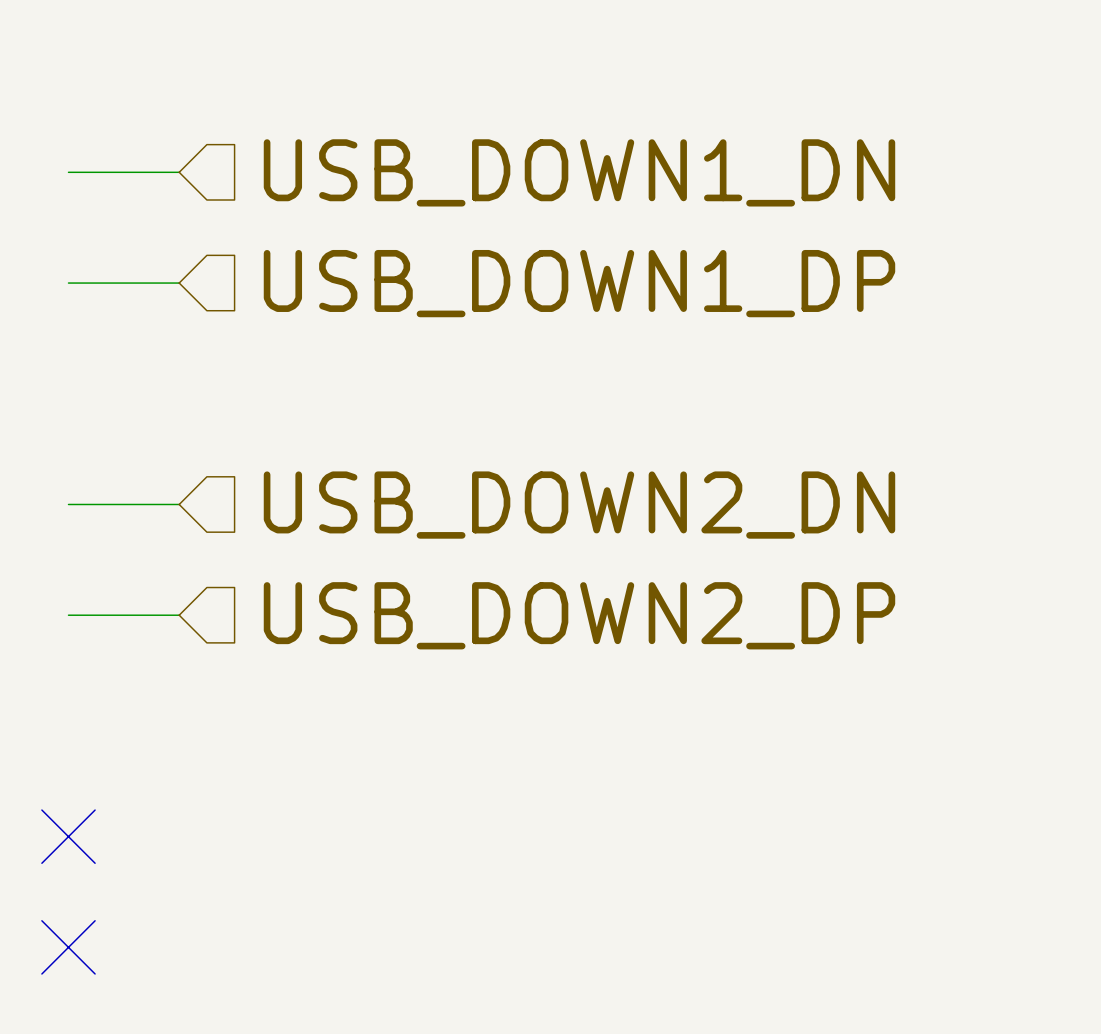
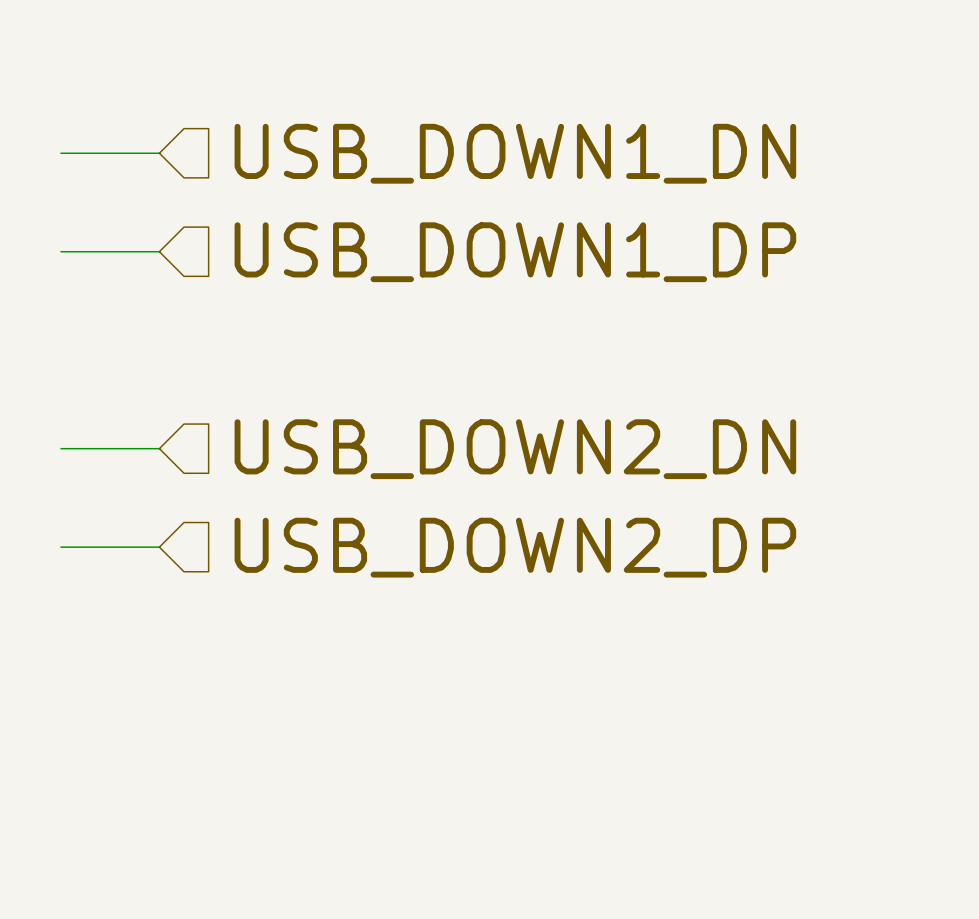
no-connect mark: (68, 836) -> none
no-connect mark: (68, 947) -> none

